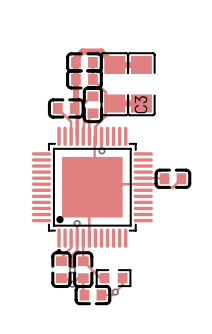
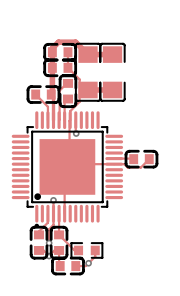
C3 name: C3 (140, 104) -> none

